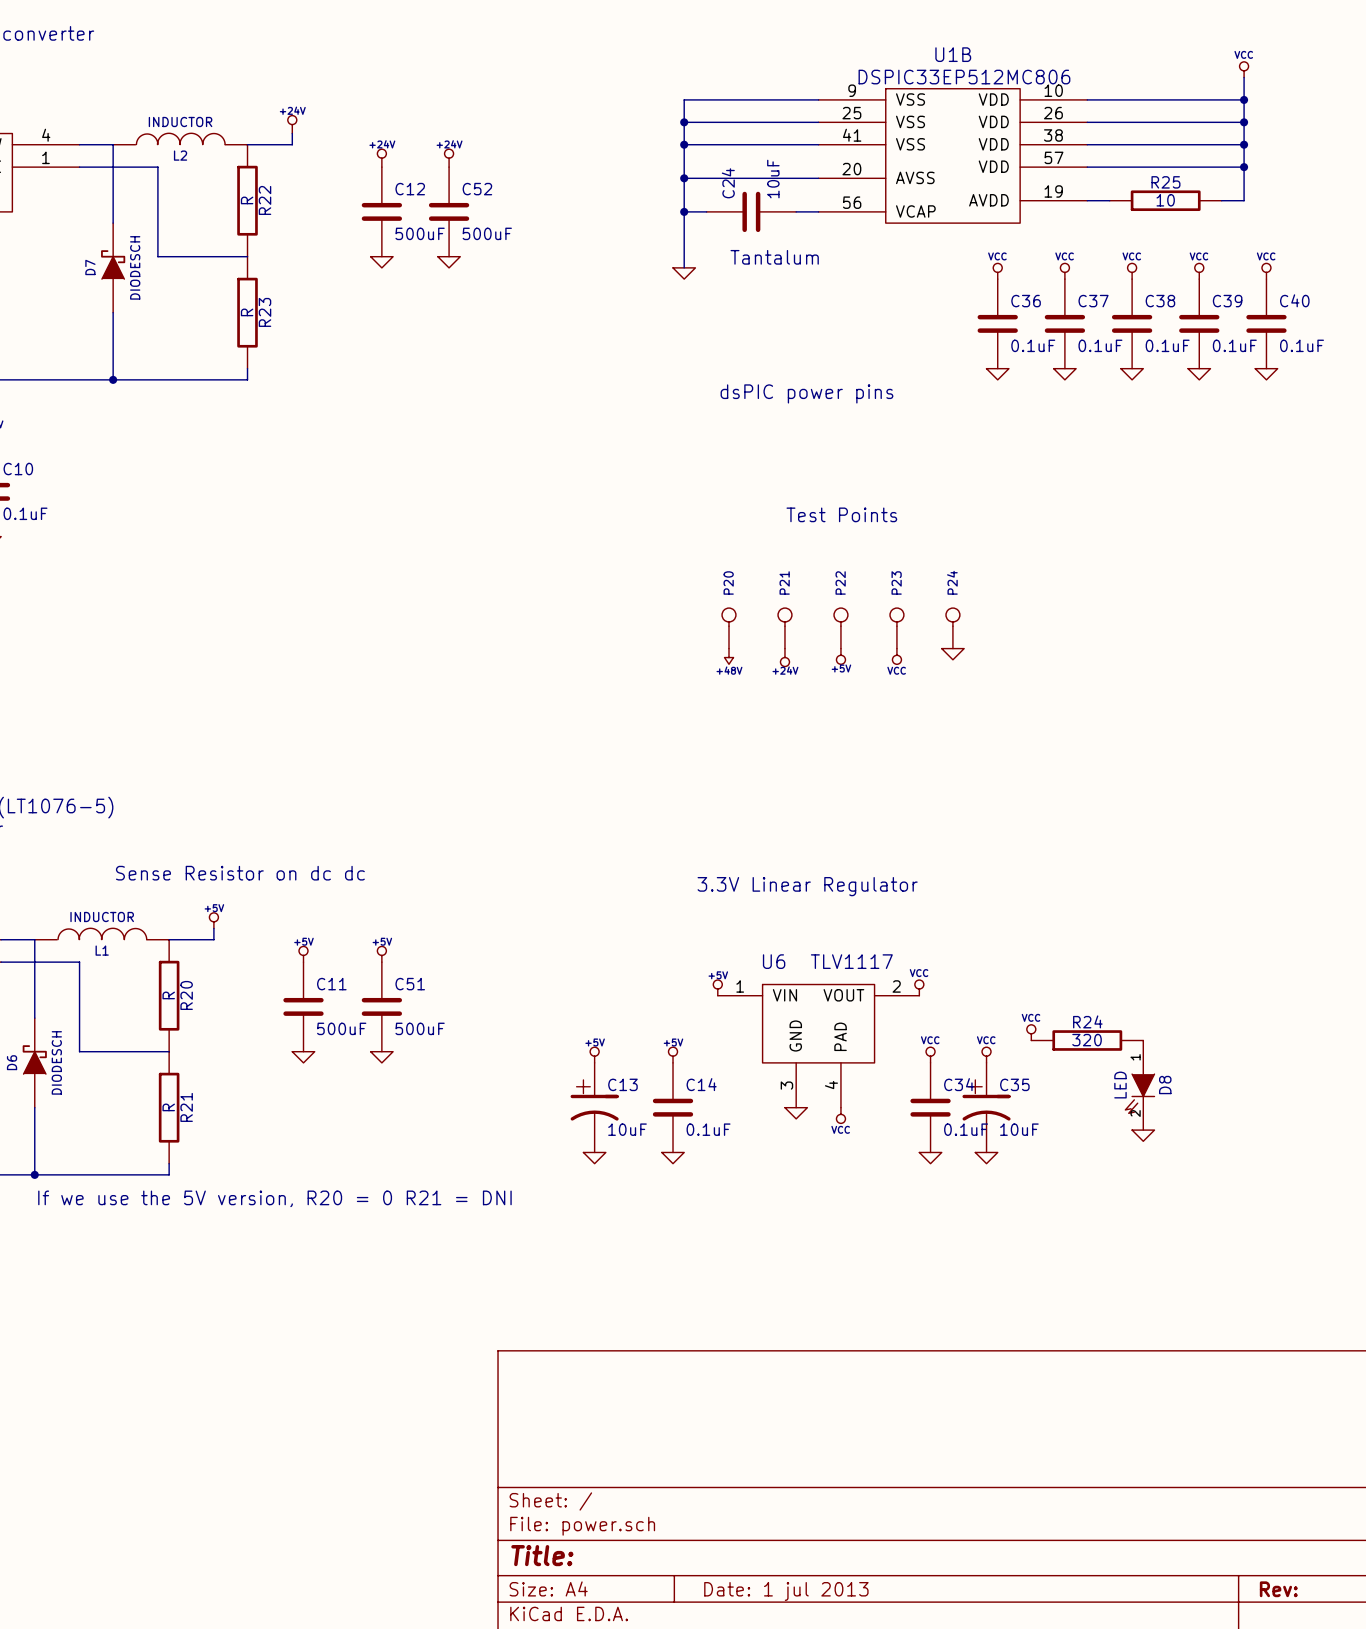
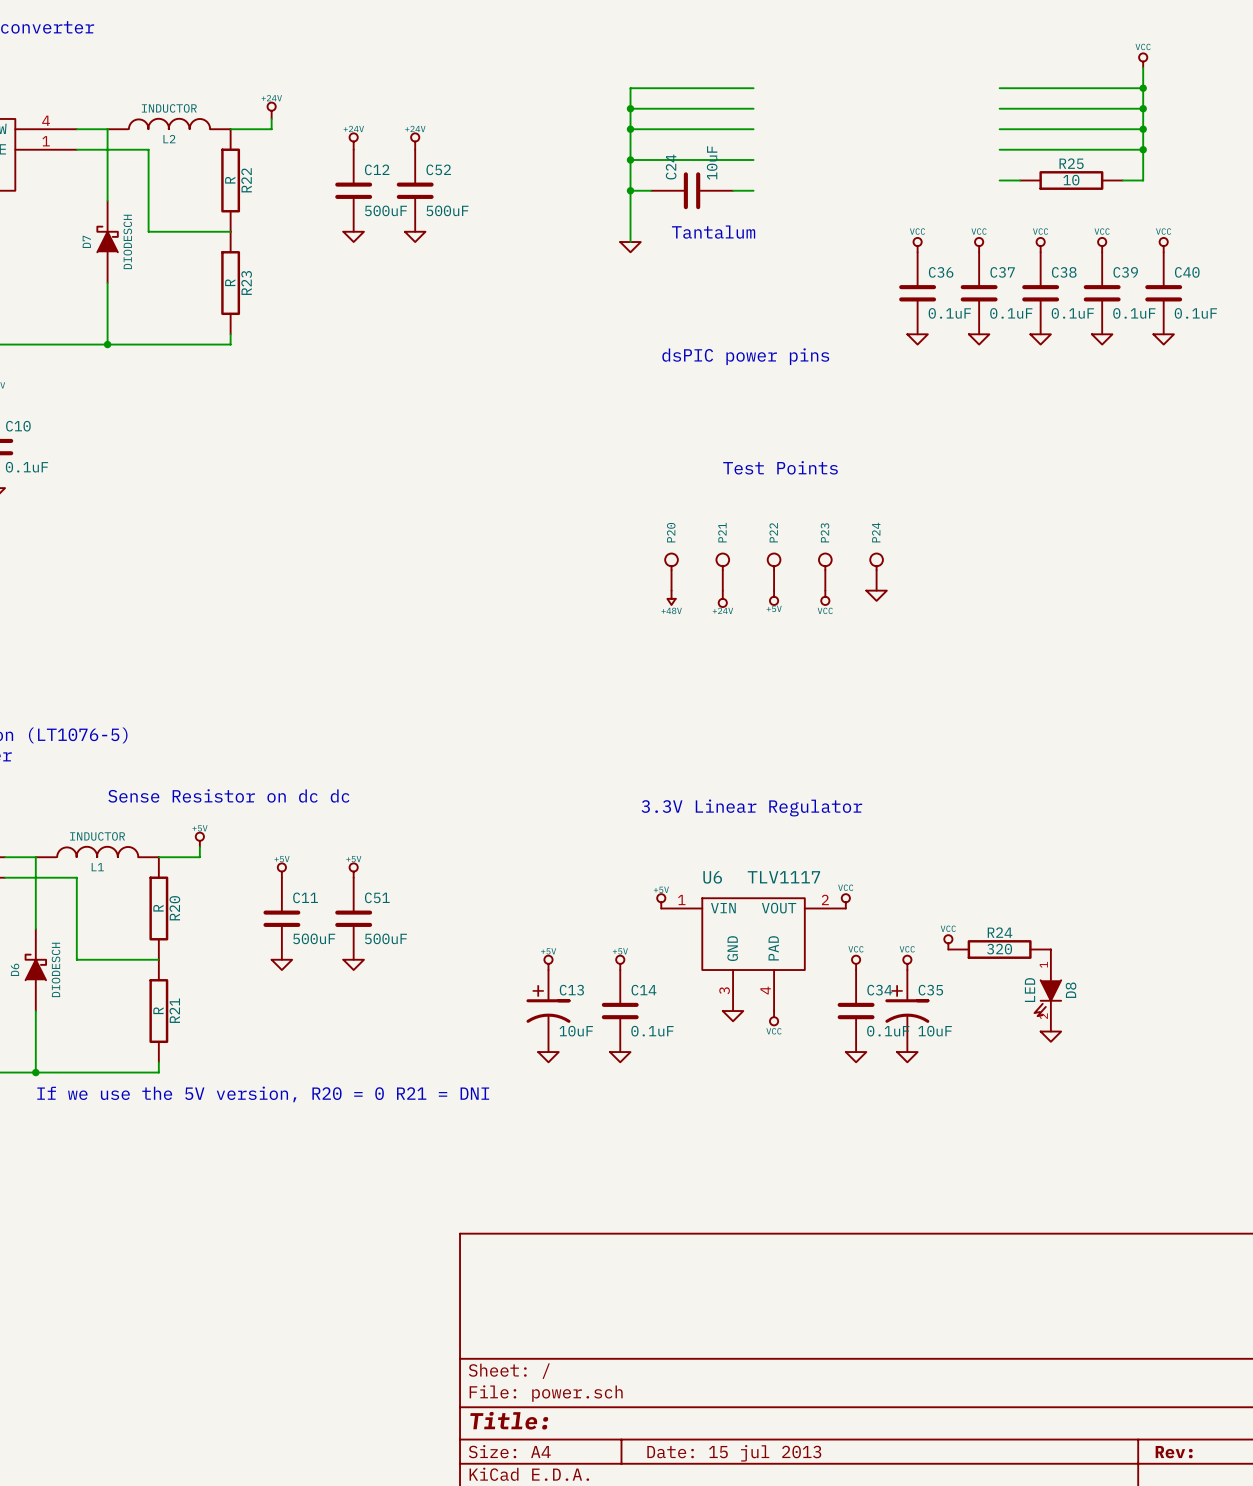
U1B: DSPIC33EP512MC806 (952, 155) -> none
title block: Date: 1 jul 2013 (786, 1591) -> Date: 15 jul 2013 (734, 1453)

